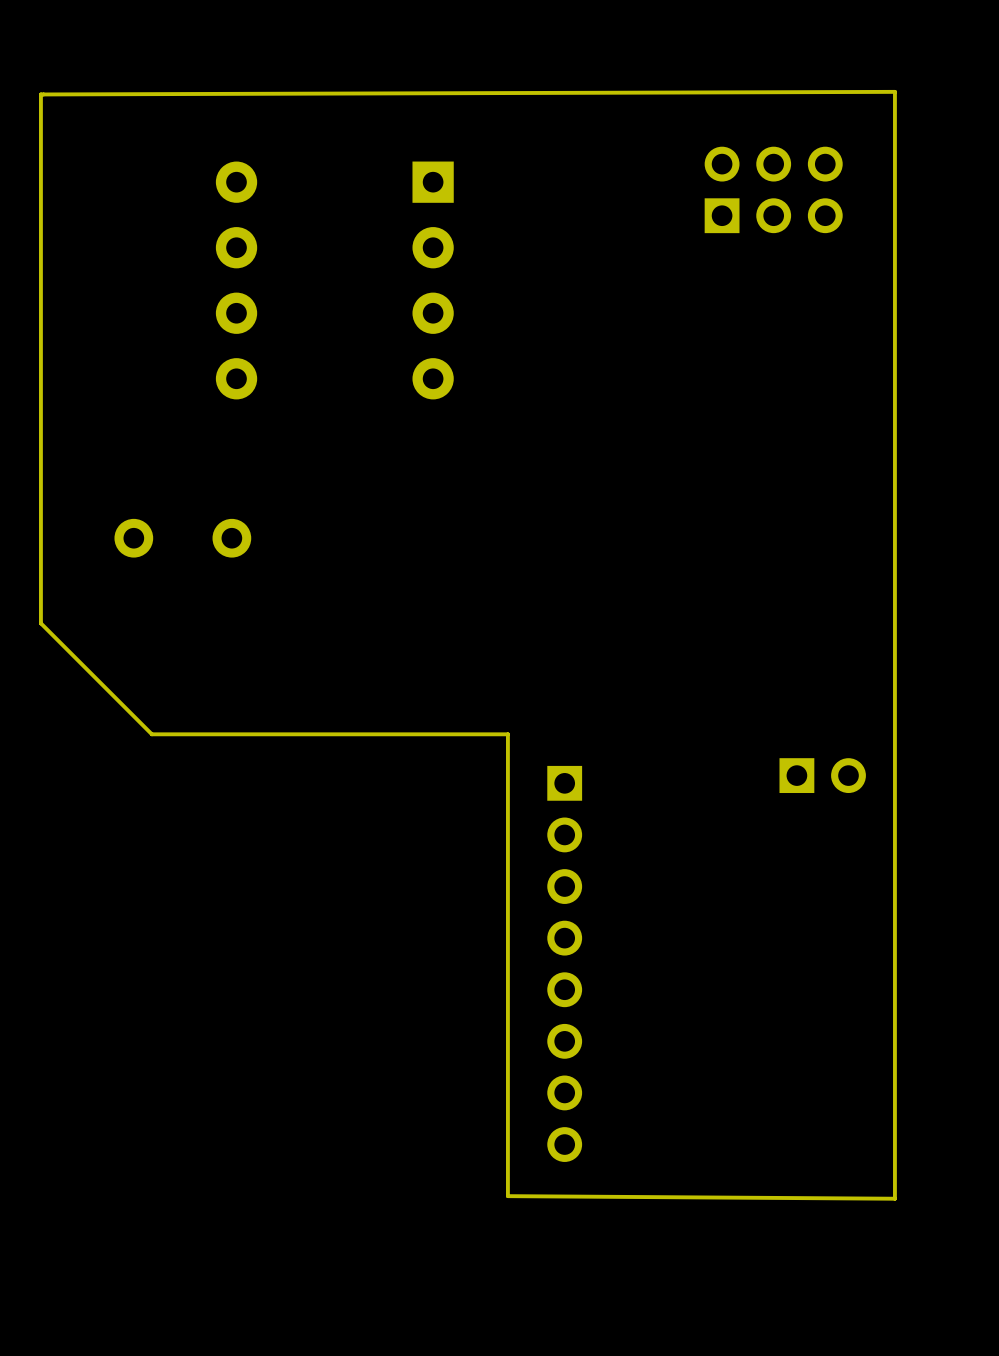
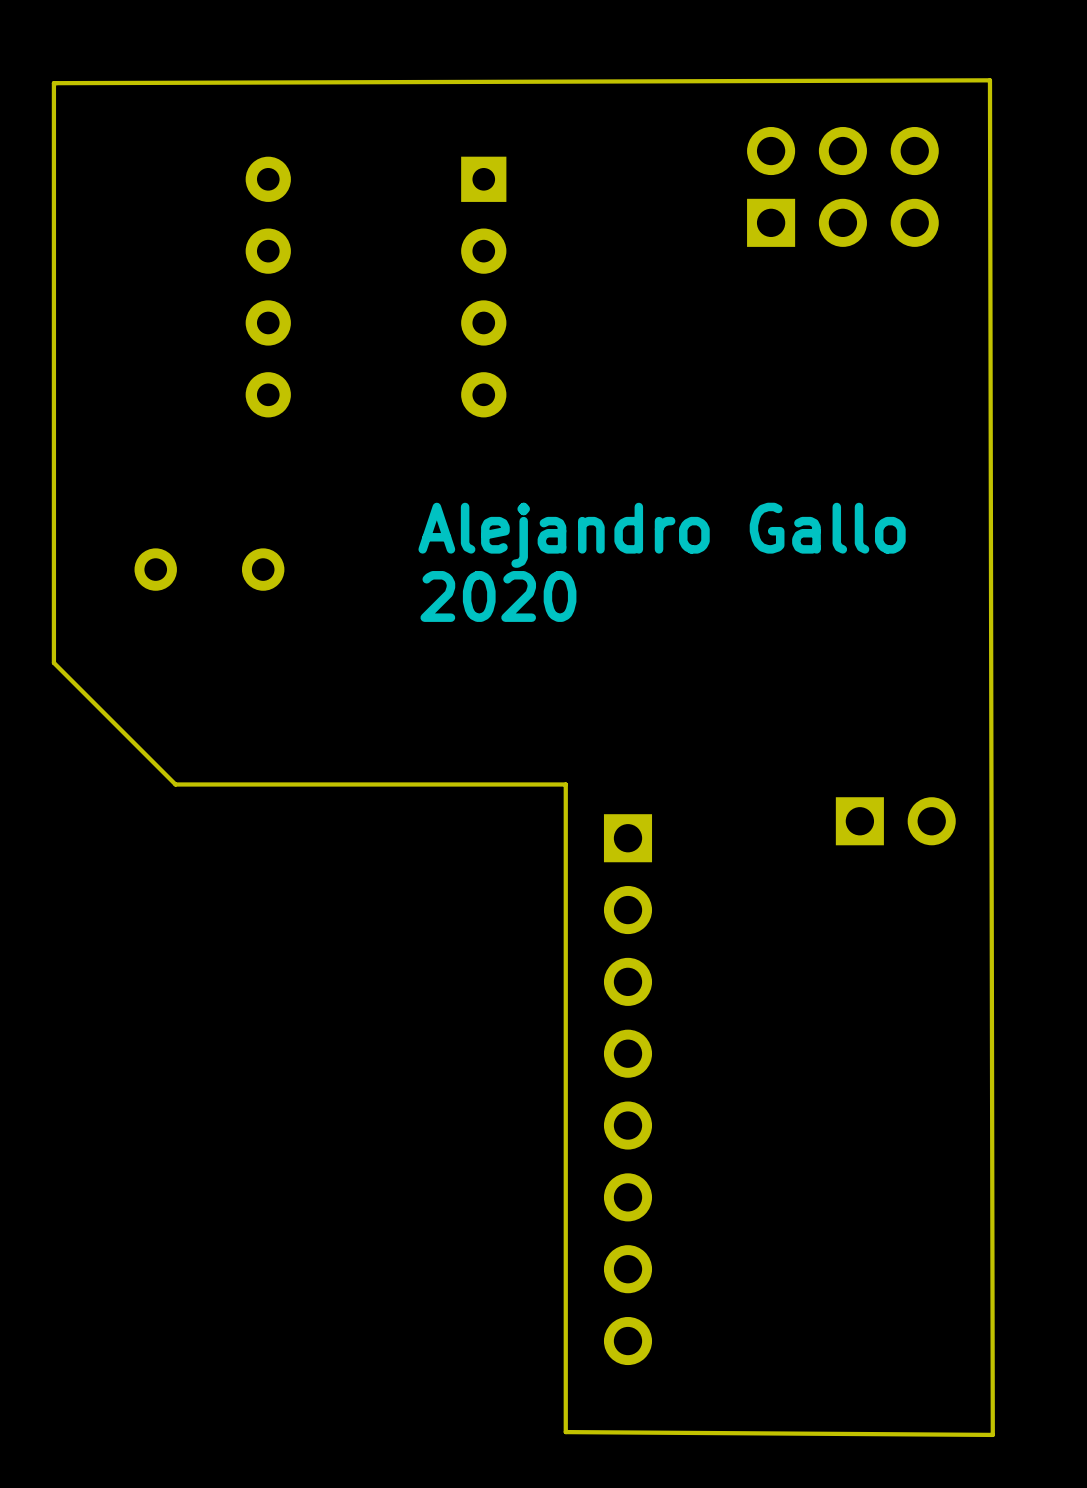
board edge: (894, 91) (894, 1198) (507, 1196) -> (989, 80) (992, 1434) (565, 1432) (565, 1290)
part footprint: [704, 146, 843, 234] -> [747, 126, 939, 247]
text: none -> Alejandro Gallo (662, 535)
text: none -> 2020 (498, 596)
part footprint: [779, 758, 866, 794] -> [835, 797, 956, 846]
part: (564, 963) -> none
part: none -> (627, 1089)

